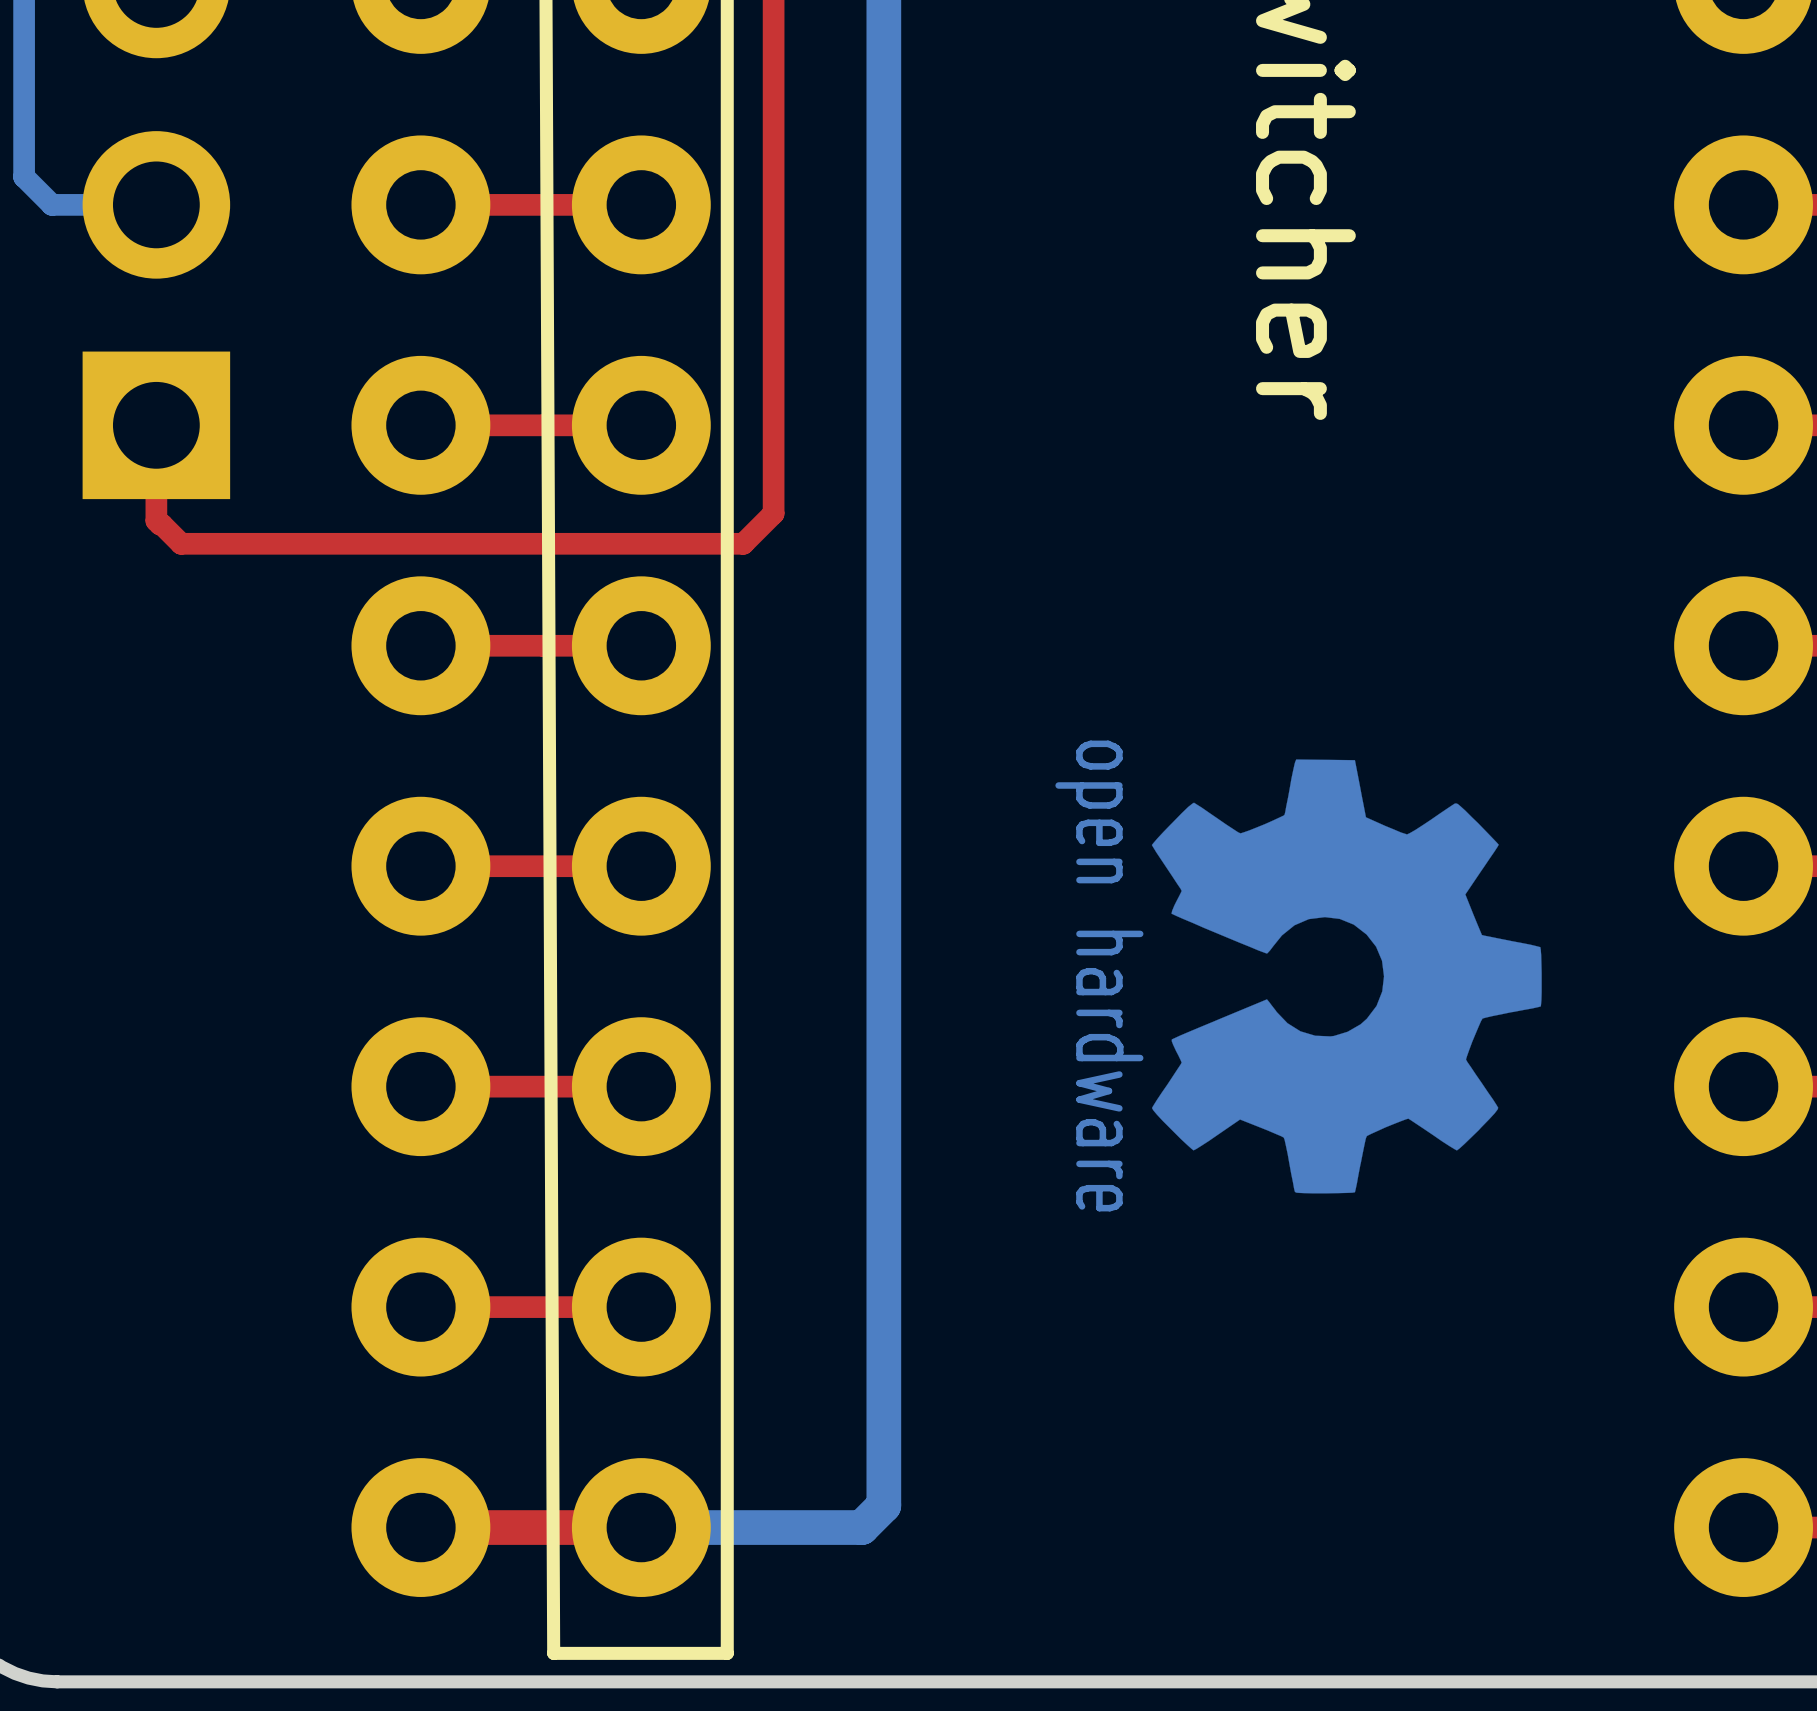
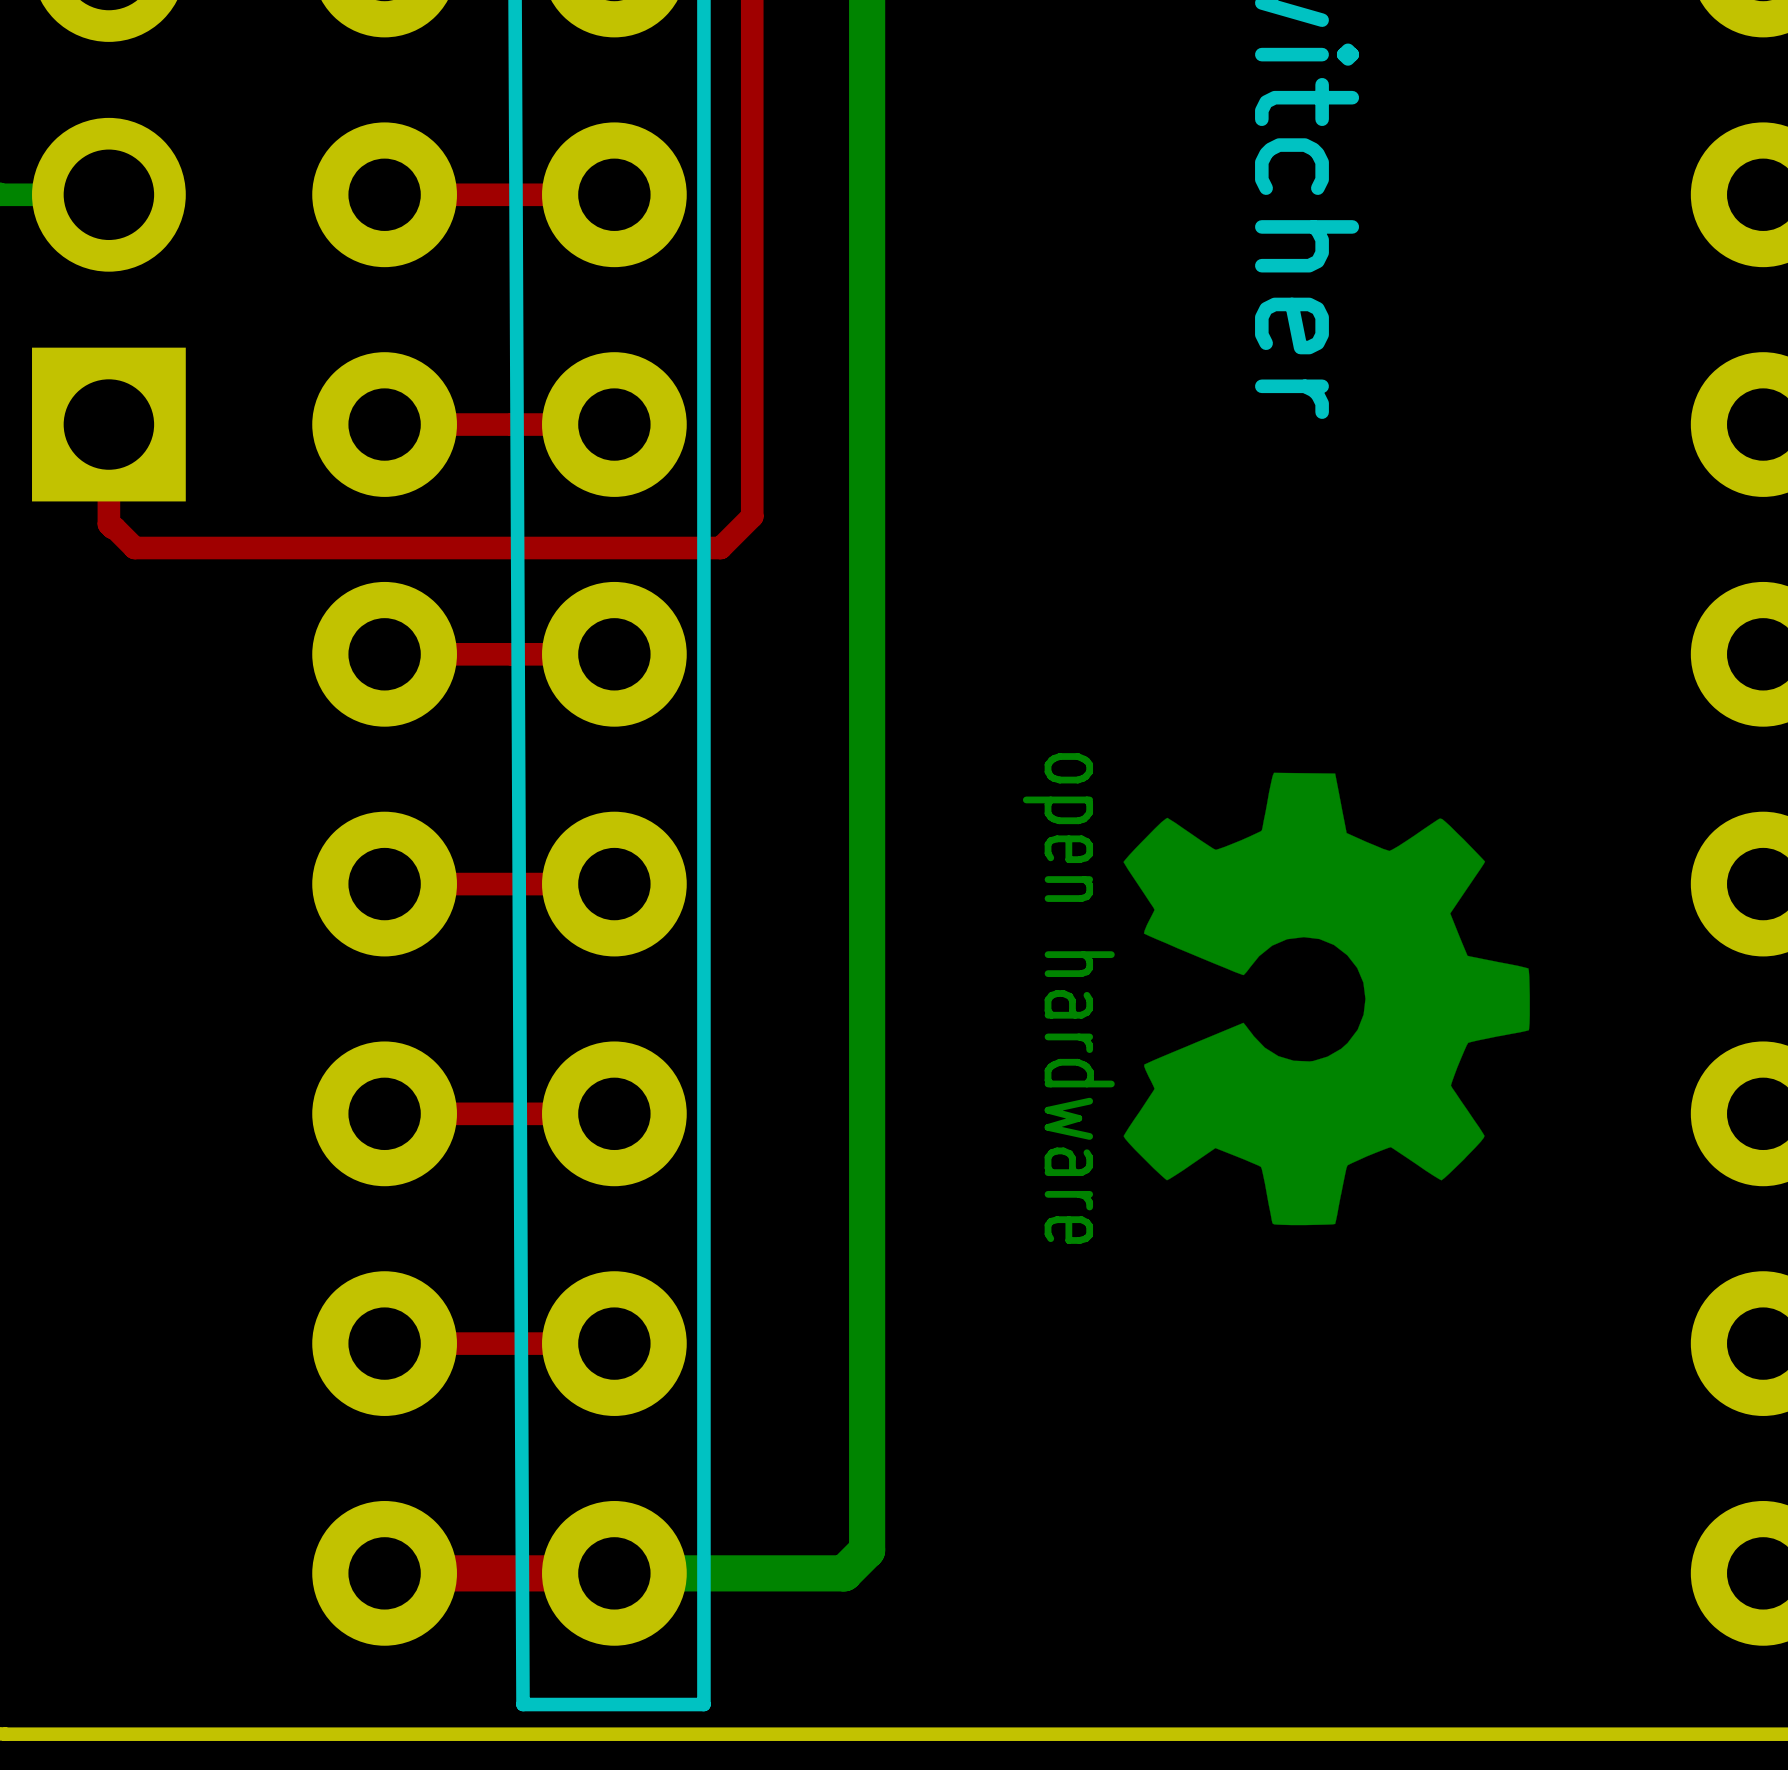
drawing position: (1298, 976) -> (1276, 998)

